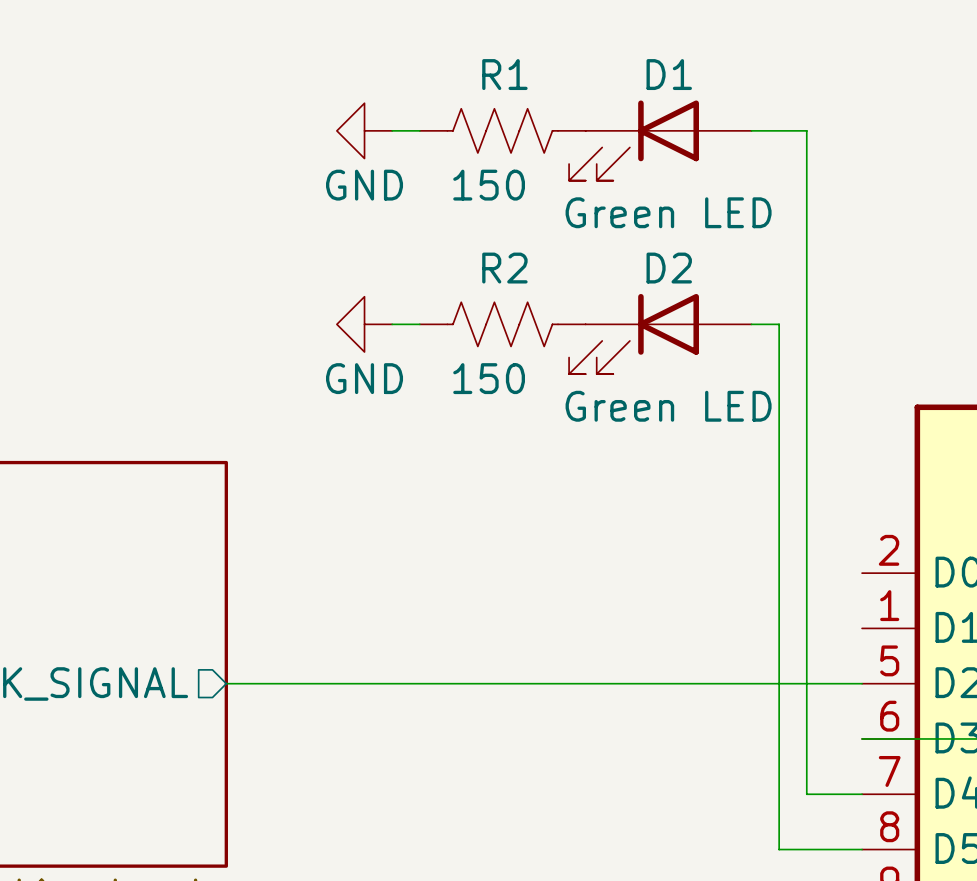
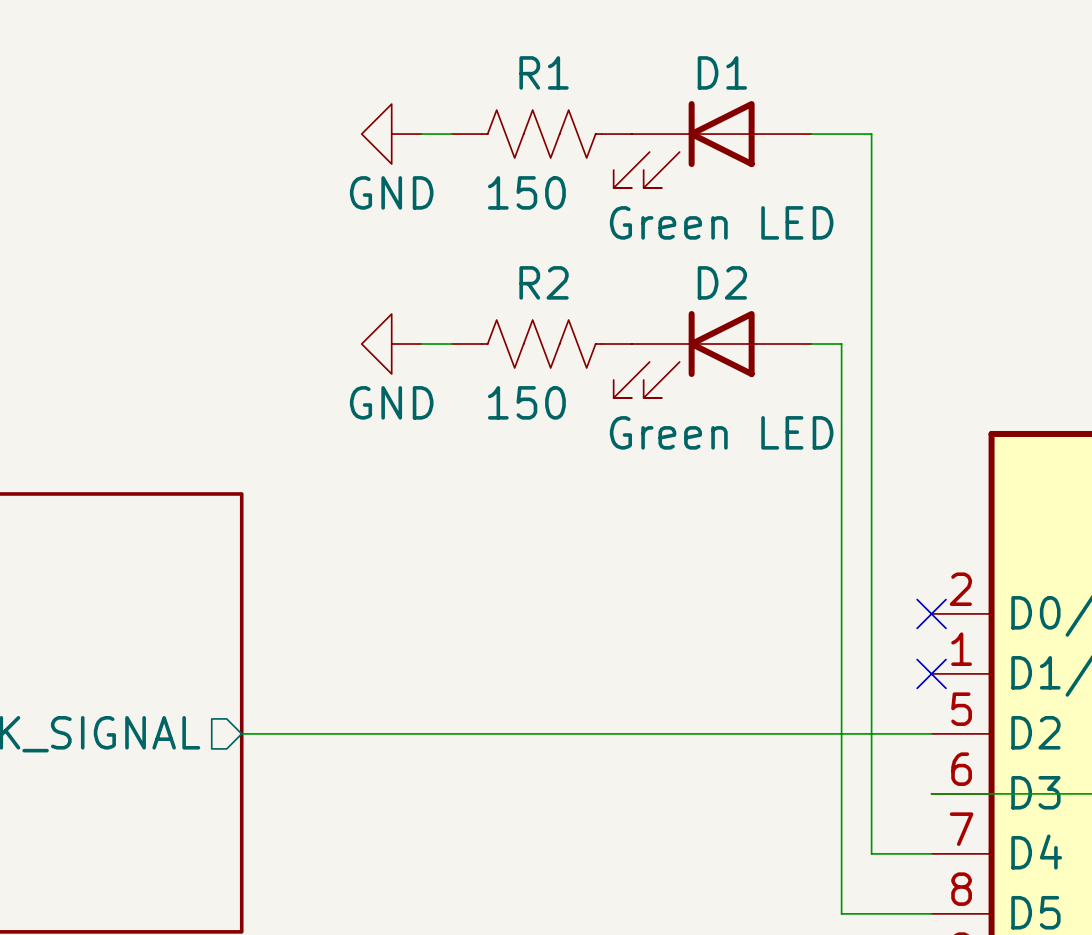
no-connect mark: none -> (931, 613)
no-connect mark: none -> (931, 673)

